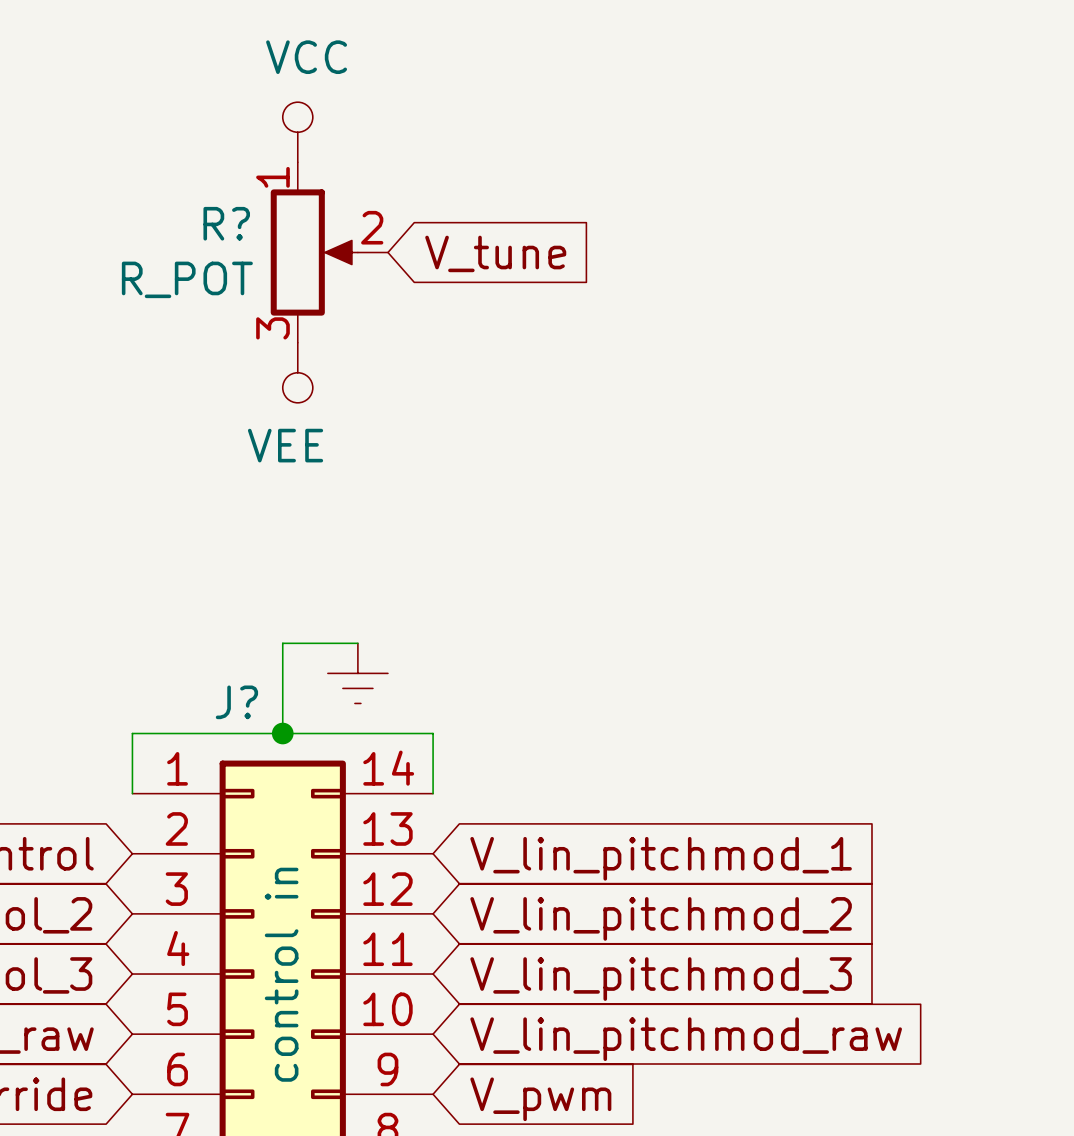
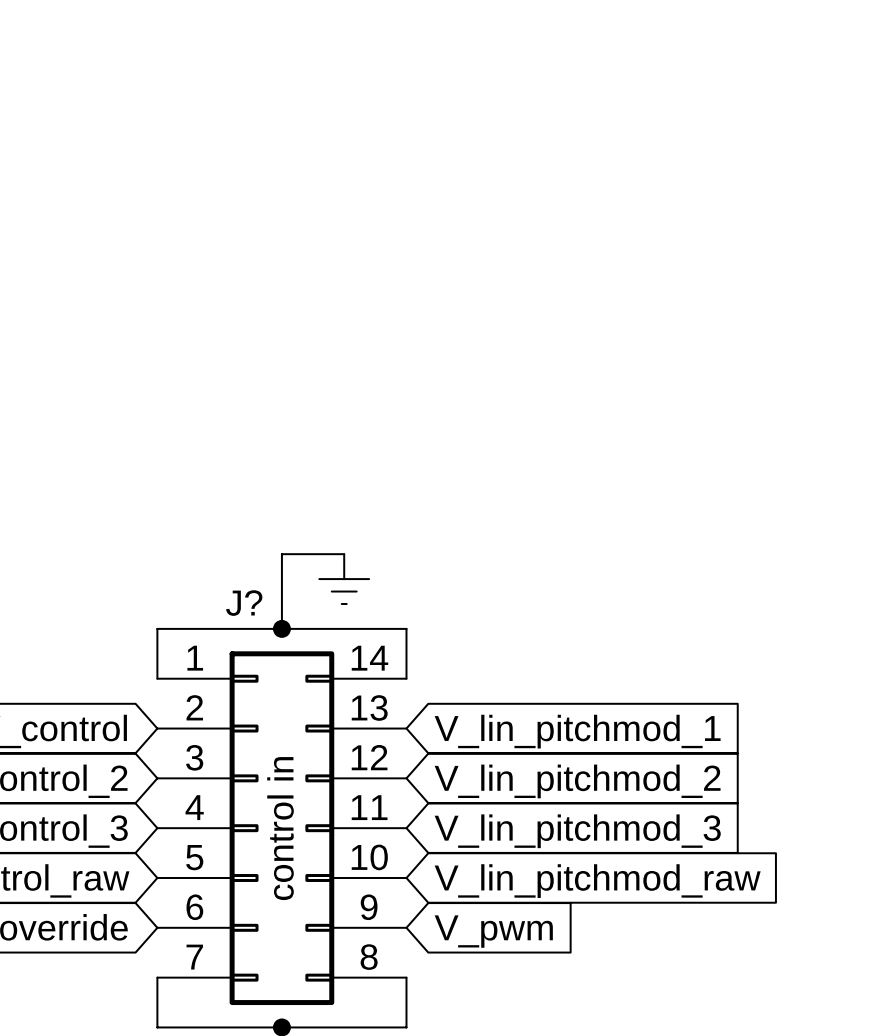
power symbol: VCC (297, 132) -> none
R?: R_POT (329, 252) -> none
global label: V_tune (495, 253) -> none
power symbol: VEE (297, 372) -> none

